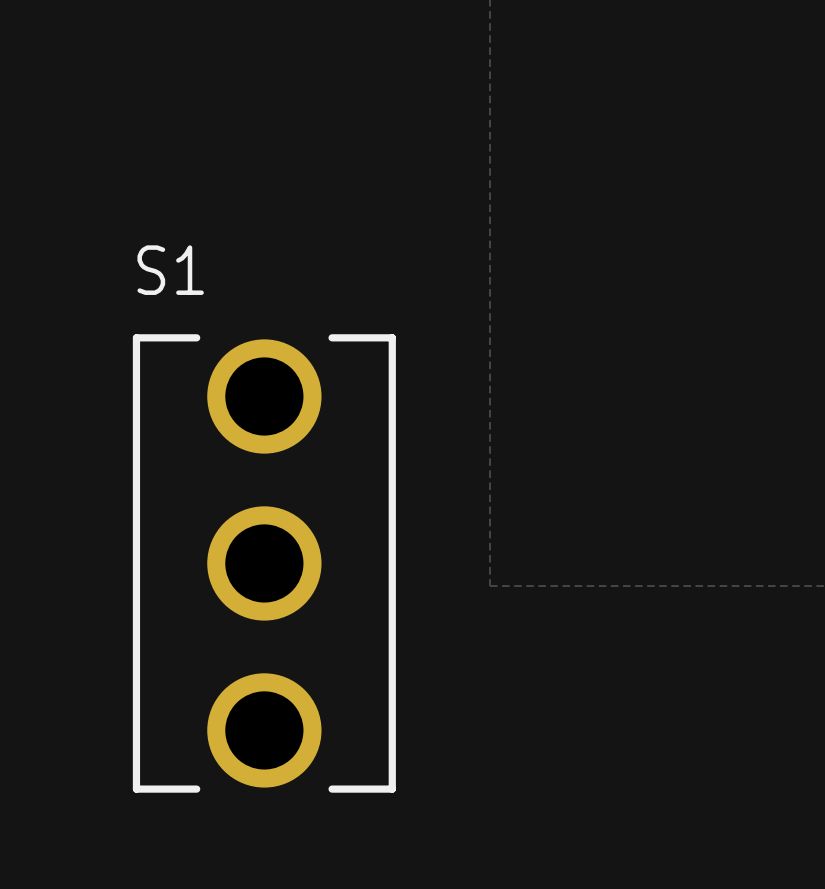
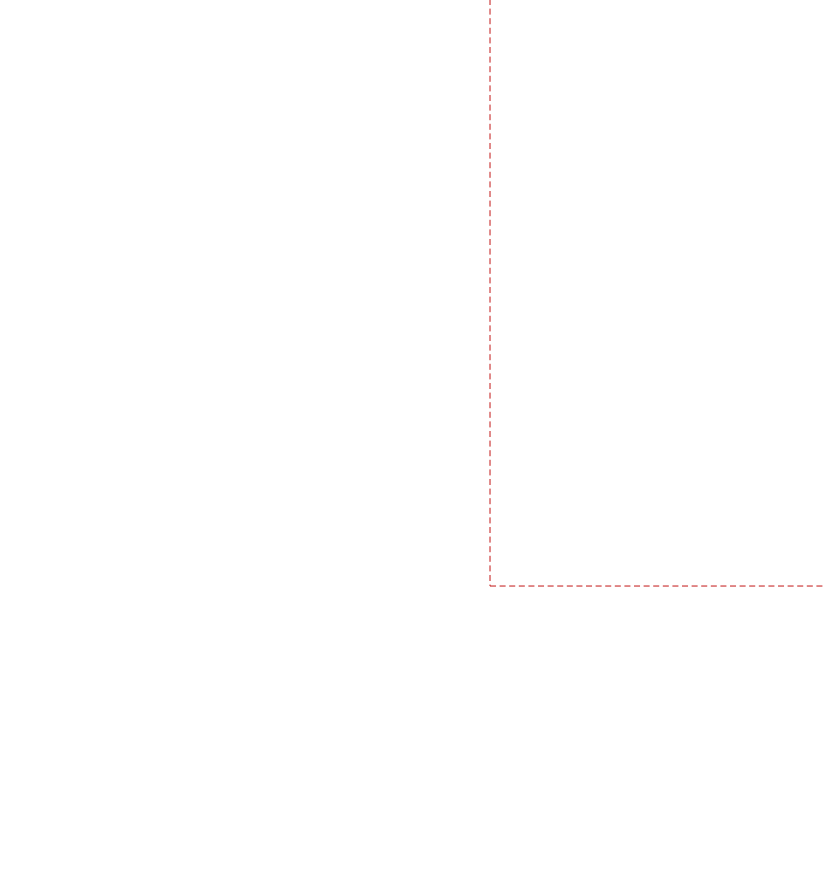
S1: (264, 563) -> none

